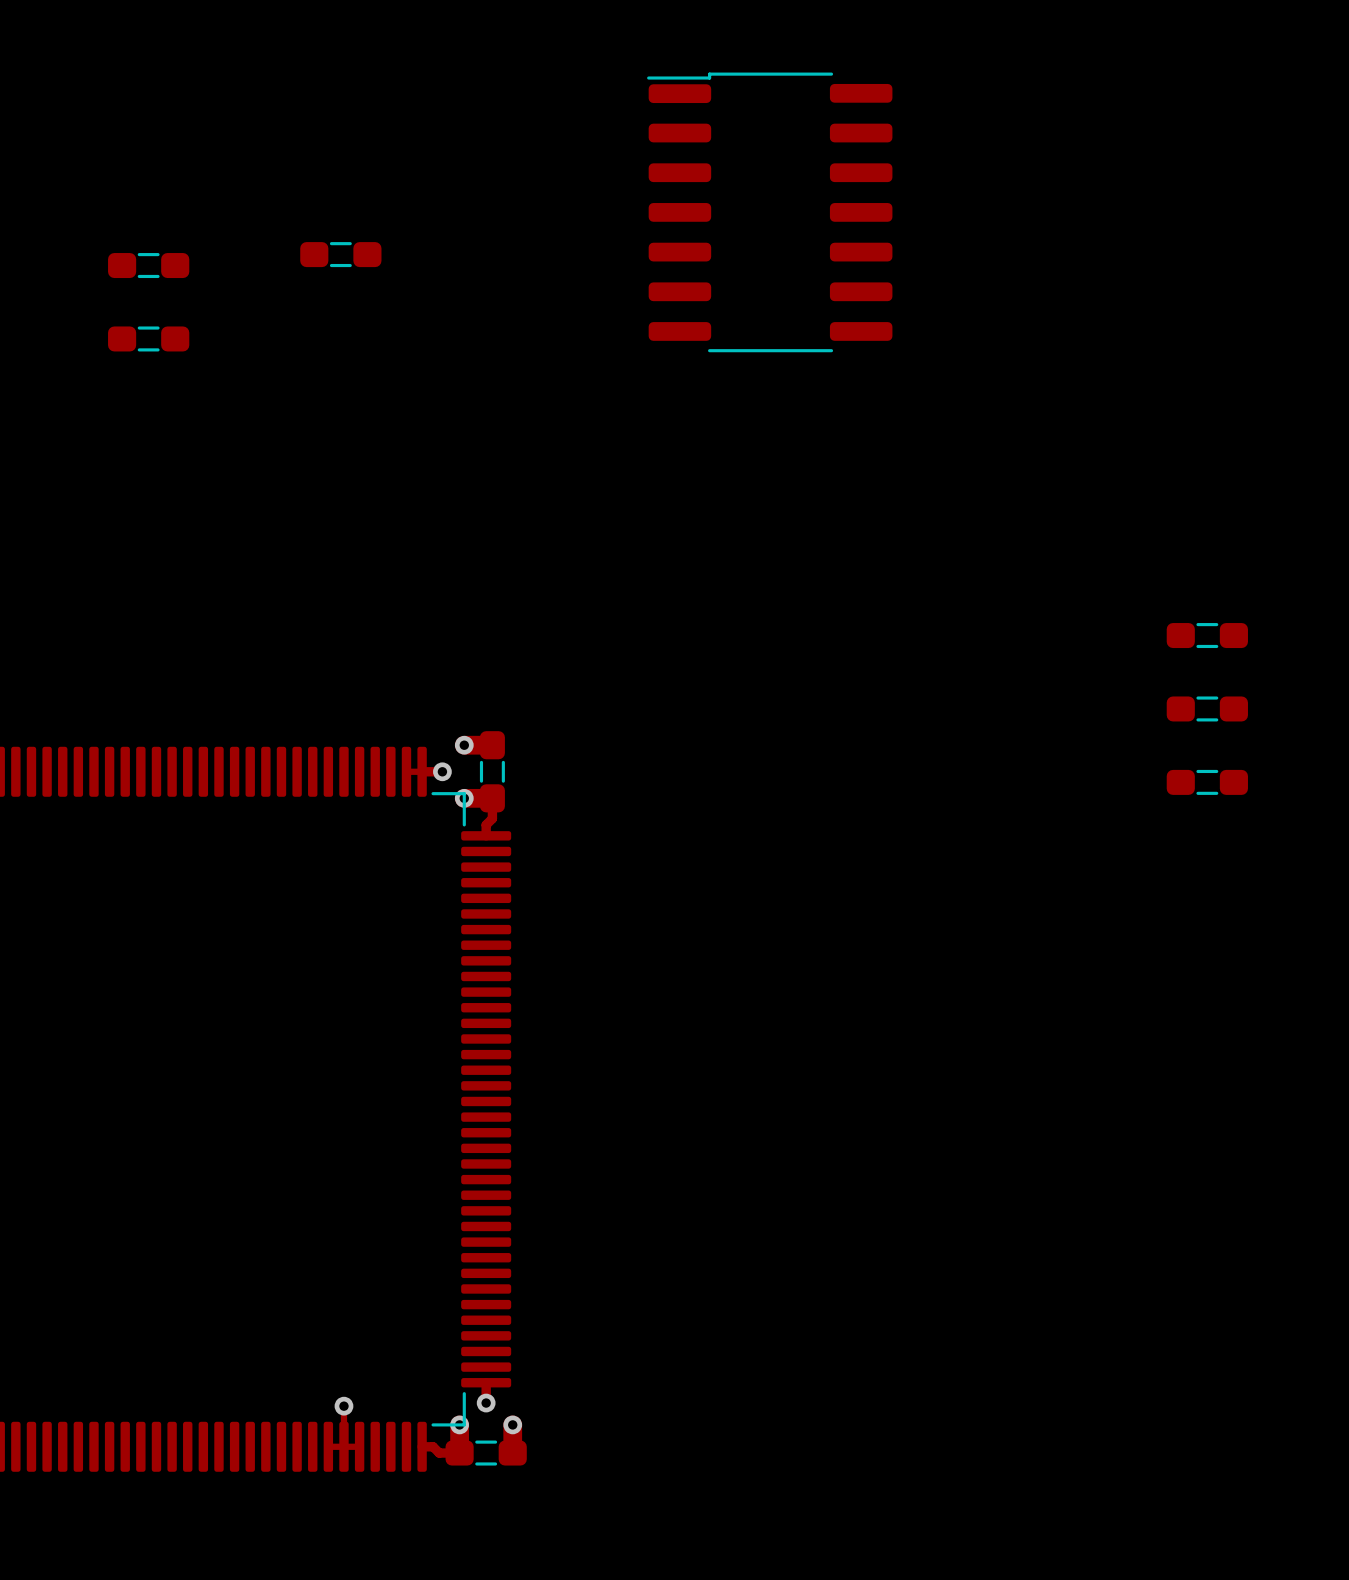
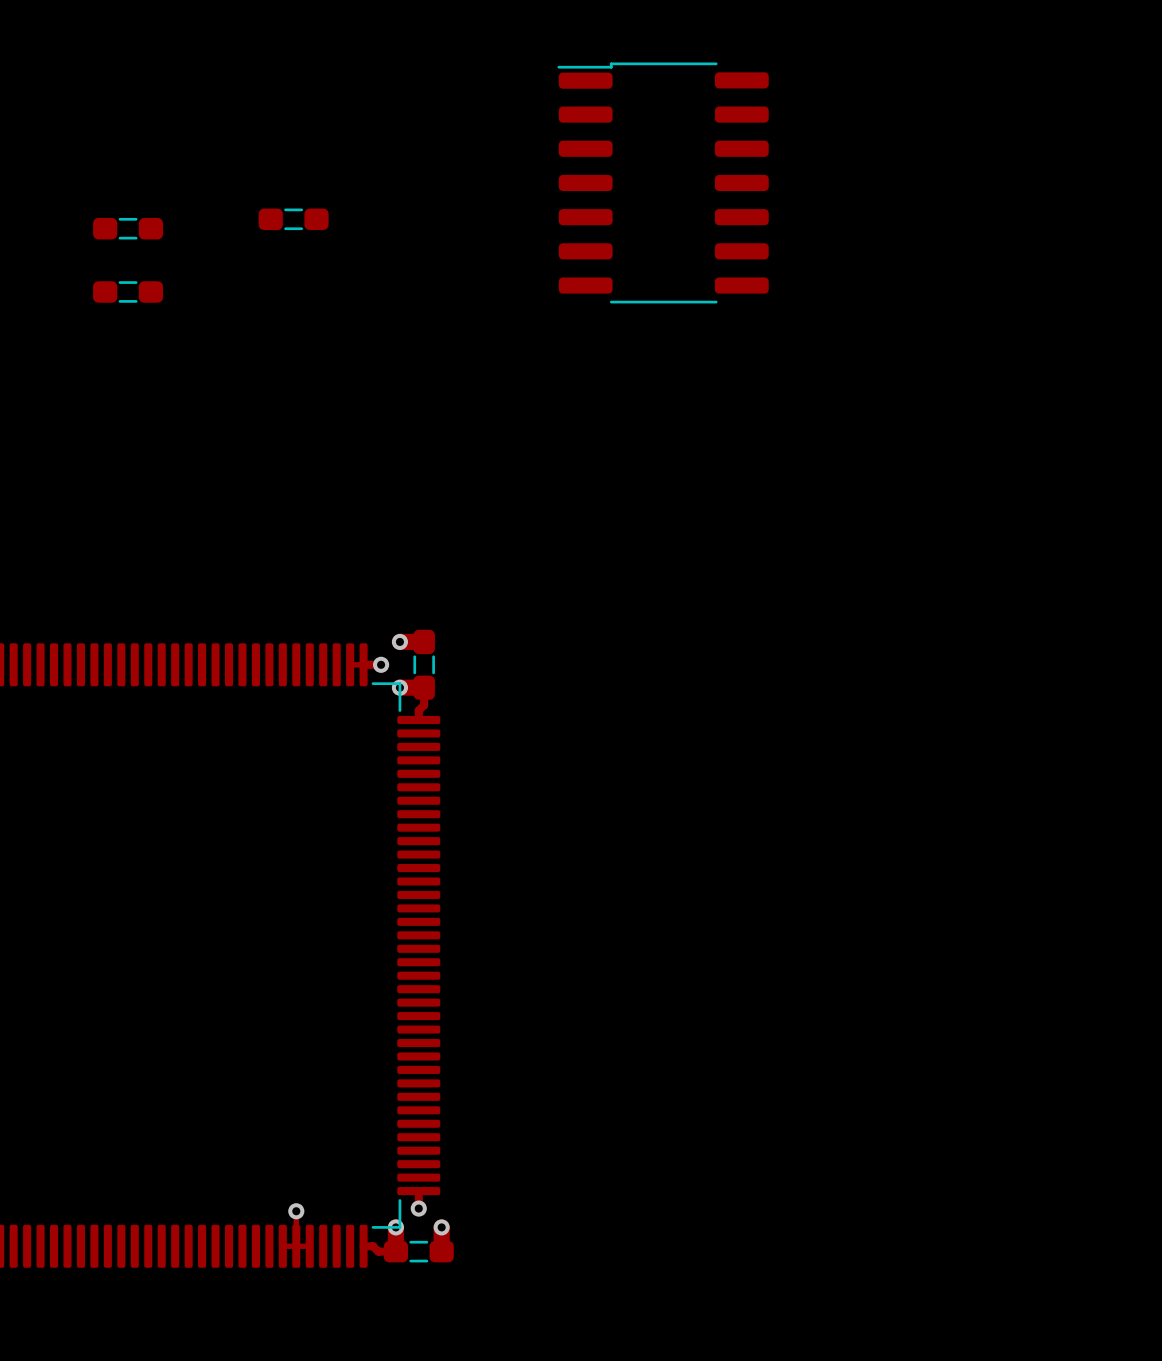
part: (1207, 635) -> none
part: (1207, 708) -> none
part: (1207, 782) -> none

